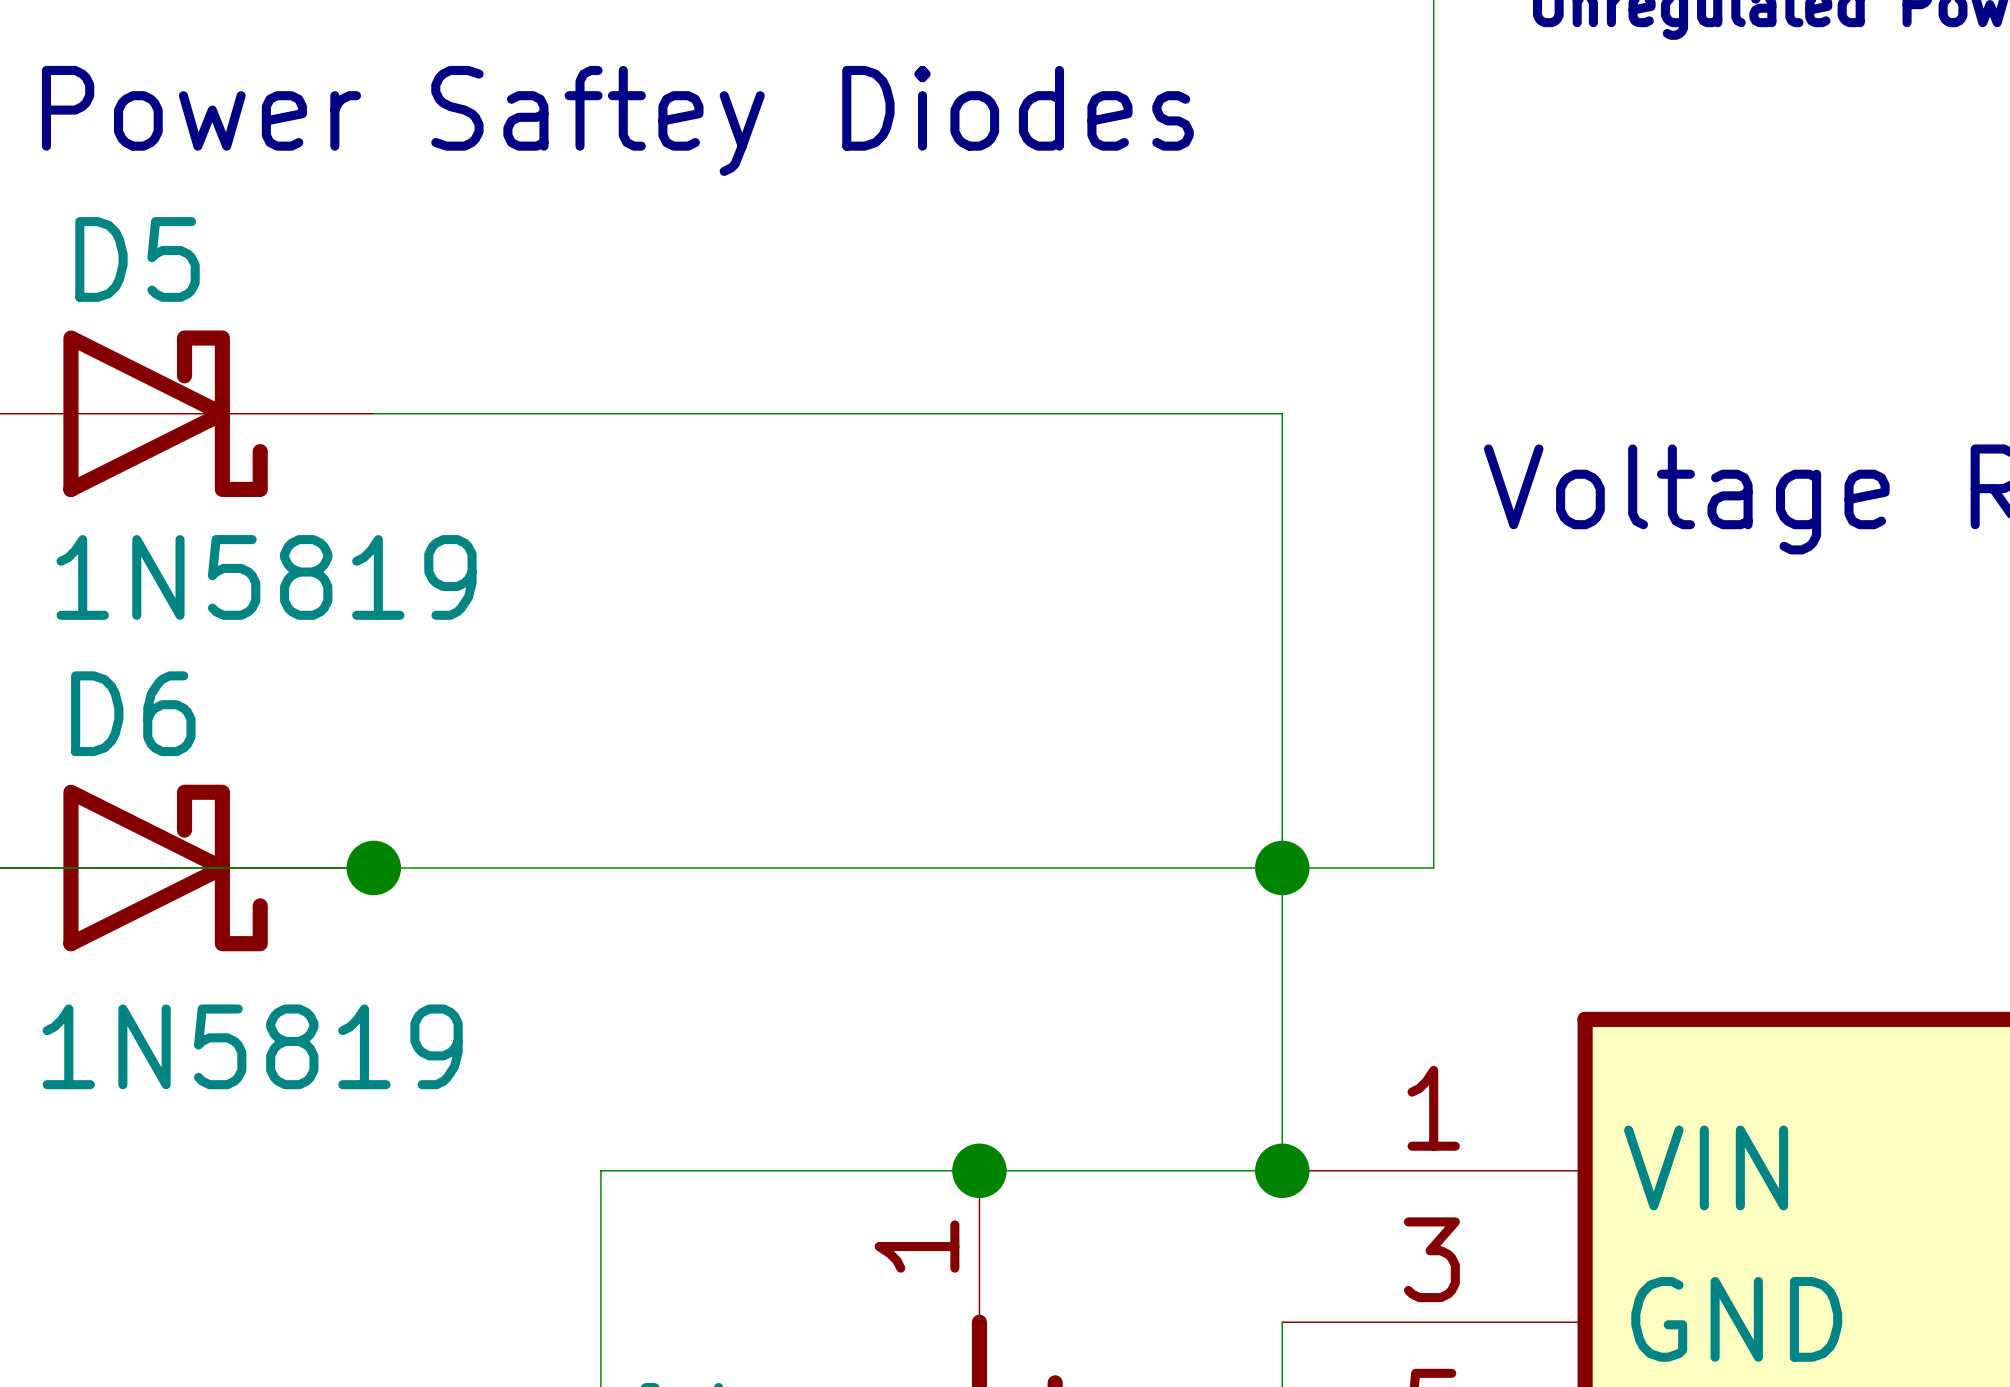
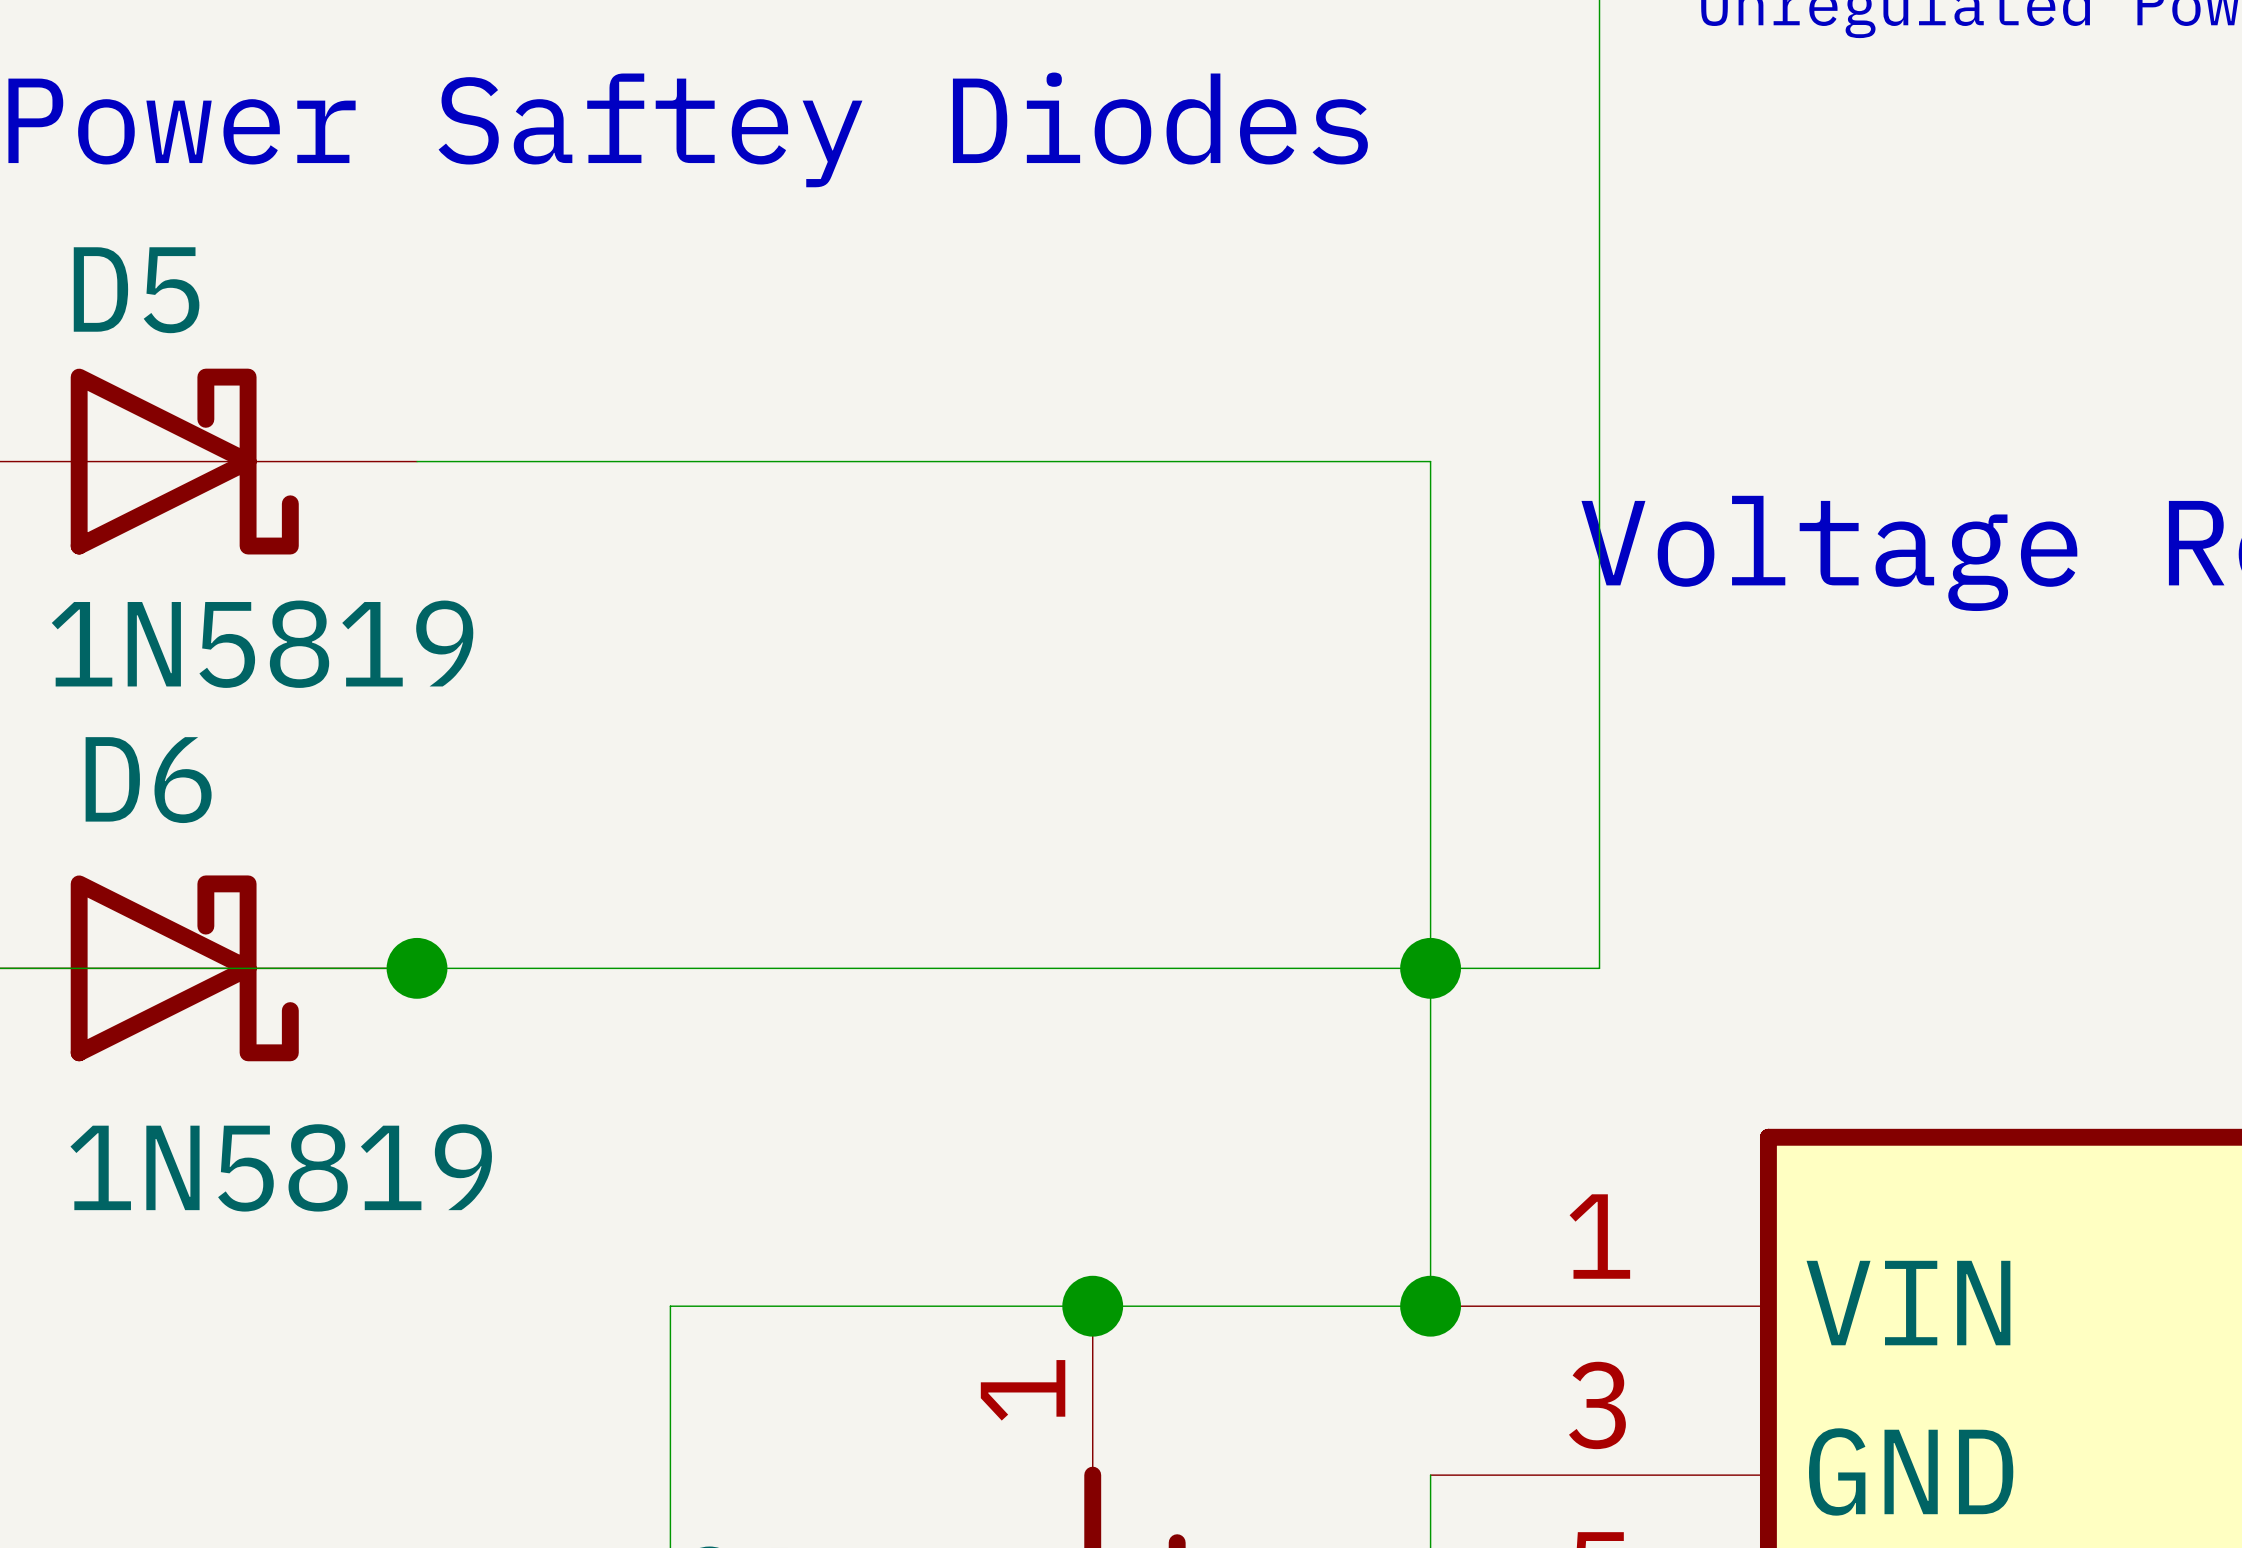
D6 name position: D6 (133, 713) -> D6 (148, 780)

